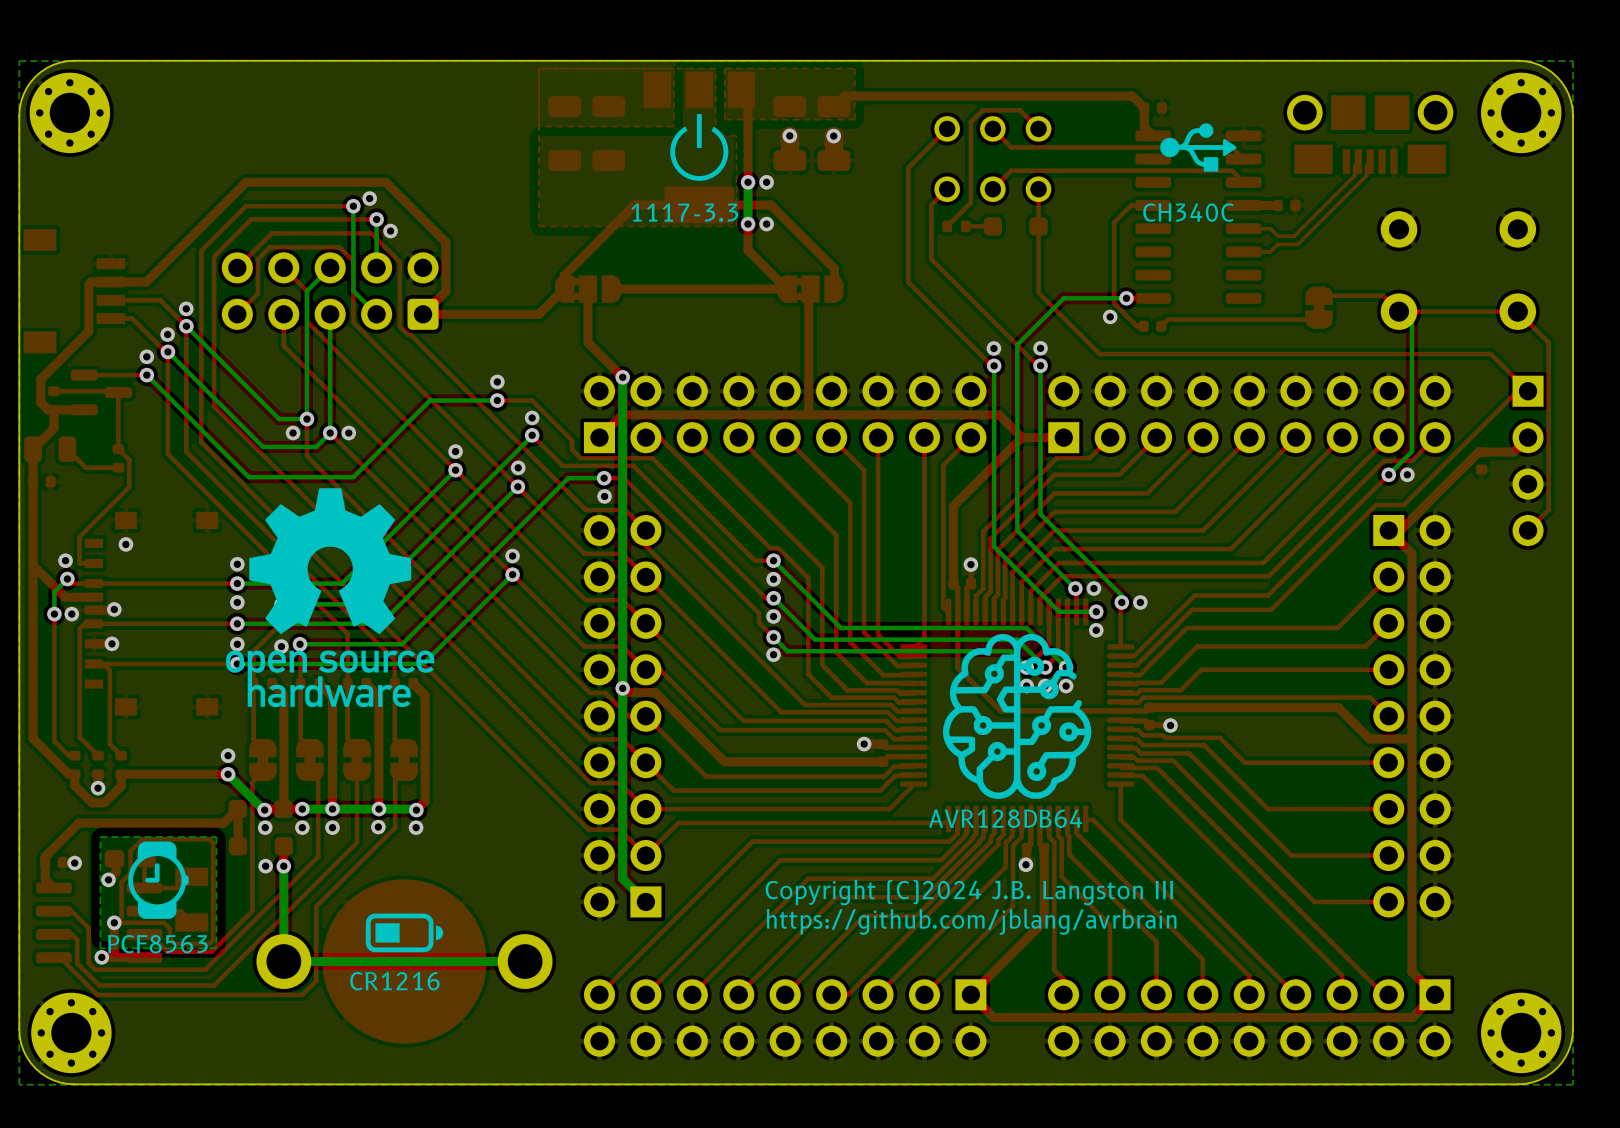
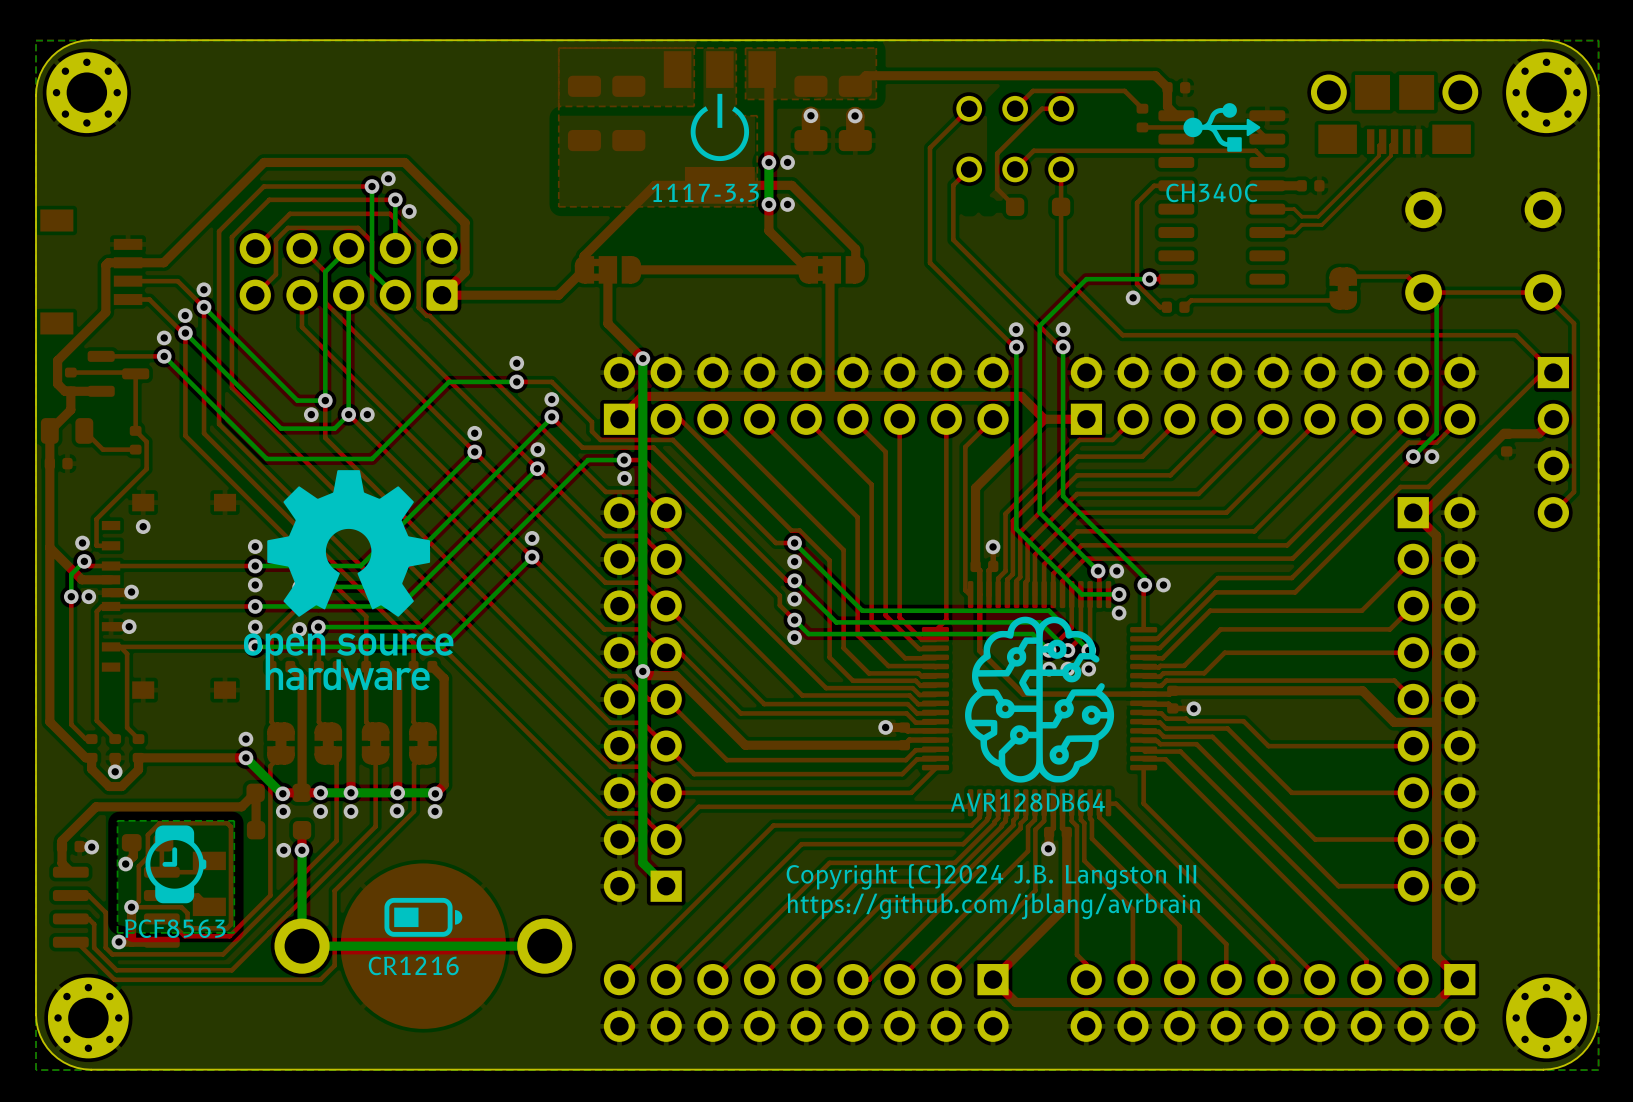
top track: (992, 128) (1011, 147) (1119, 147) -> (1015, 108) (1032, 90) (1124, 90) (1142, 108)
top track: (1038, 128) (1020, 110) (982, 110) (970, 121) (970, 202) (947, 226) -> (1061, 108) (1042, 108) (997, 153) (997, 188) (1015, 206)
part rotation: 0° (956, 226) -> 90° clockwise (1142, 118)
part position: (956, 226) -> (1142, 118)
top track: (992, 226) (965, 226) -> none

